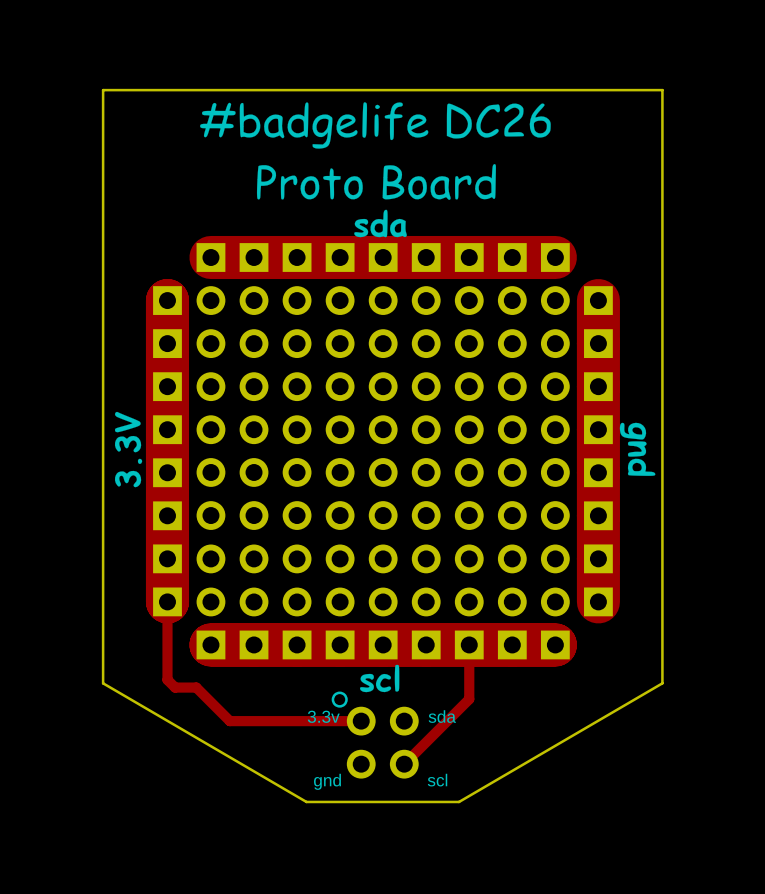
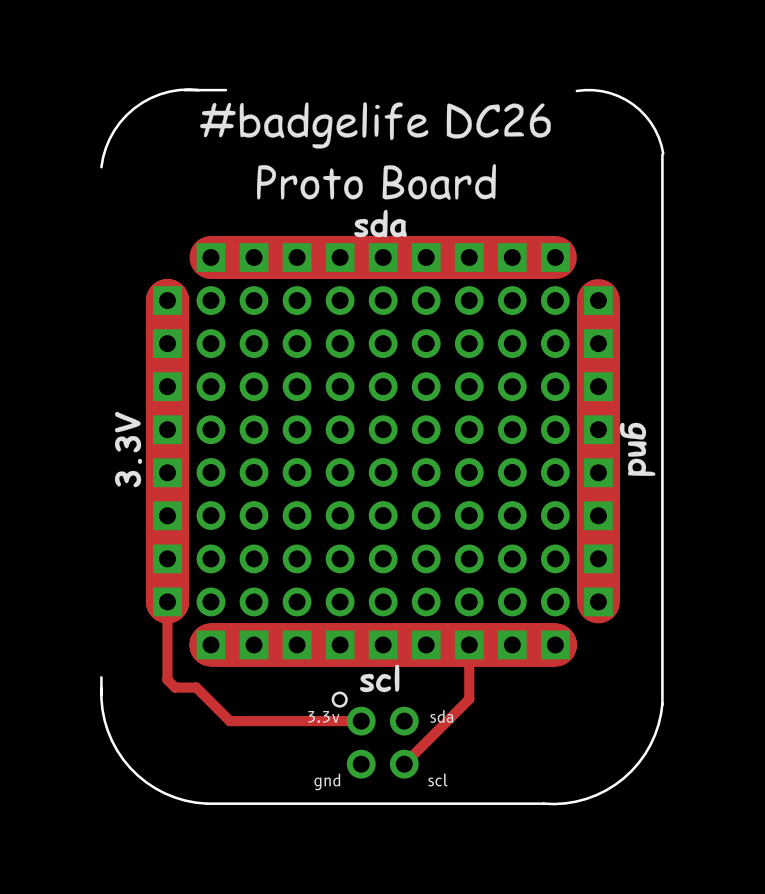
board edge: (184, 90) (103, 90) (103, 683) (306, 801) (459, 801) (662, 683) -> (662, 704) (662, 683)
board edge: none -> (198, 90) (179, 90) (159, 94) (134, 108) (114, 130) (105, 148) (101, 167)
board edge: (225, 90) (662, 90) (662, 154) -> none
board edge: none -> (576, 90) (602, 91) (618, 96) (633, 104) (645, 115) (655, 129) (663, 153)
board edge: none -> (101, 677) (101, 694)
board edge: none -> (101, 688) (102, 710) (107, 730) (117, 750) (130, 767) (146, 782) (164, 793) (185, 800) (206, 803)
board edge: none -> (662, 703) (655, 735) (638, 762) (623, 778) (606, 790) (575, 801) (554, 804) (207, 803)

